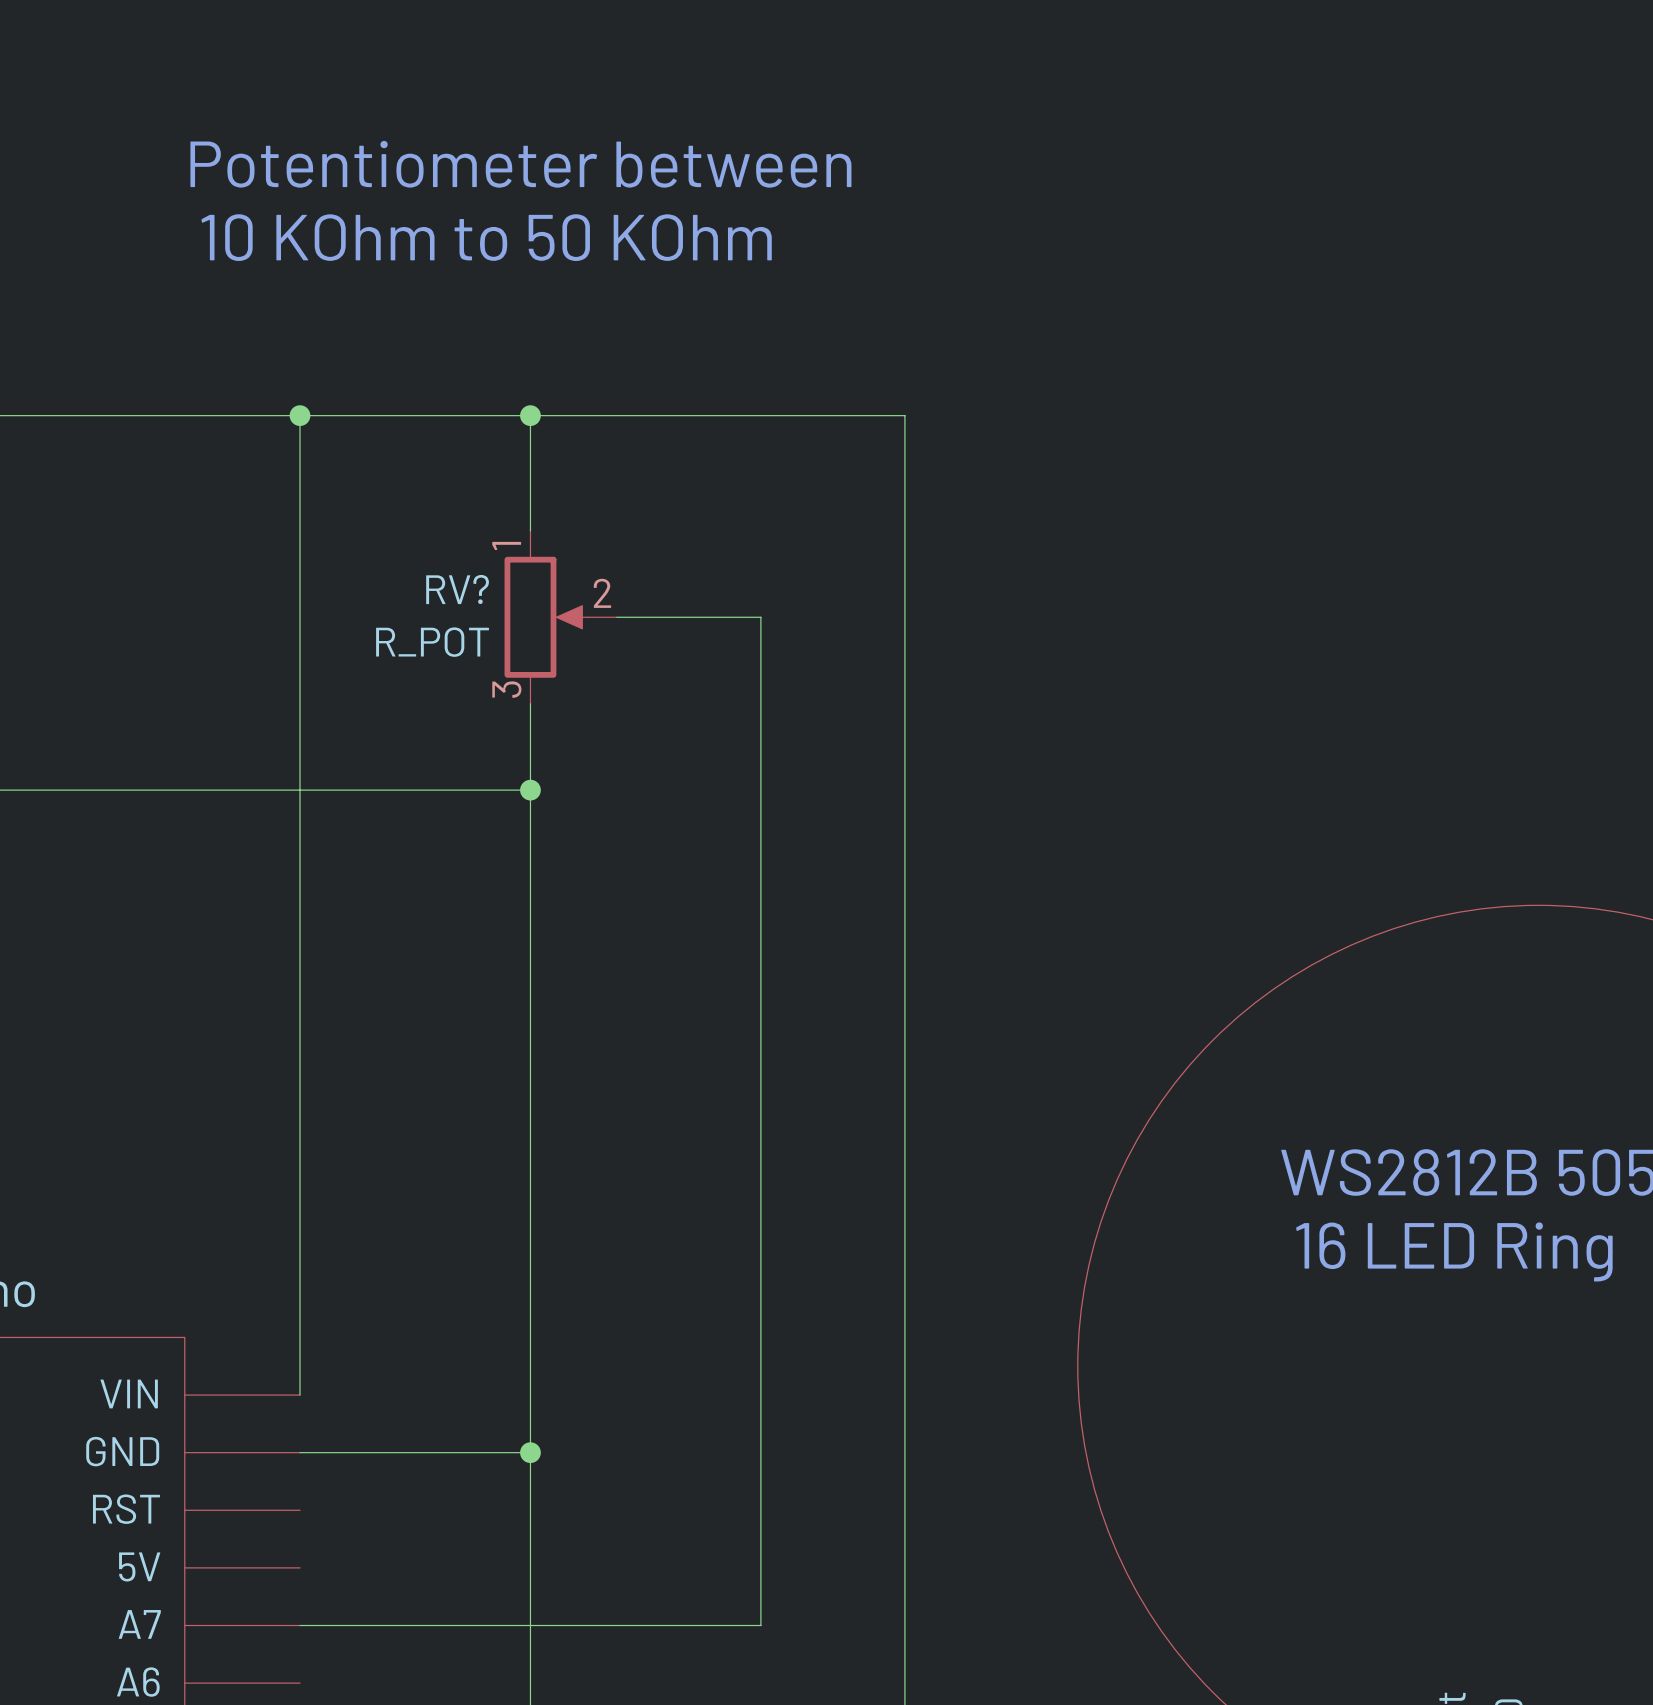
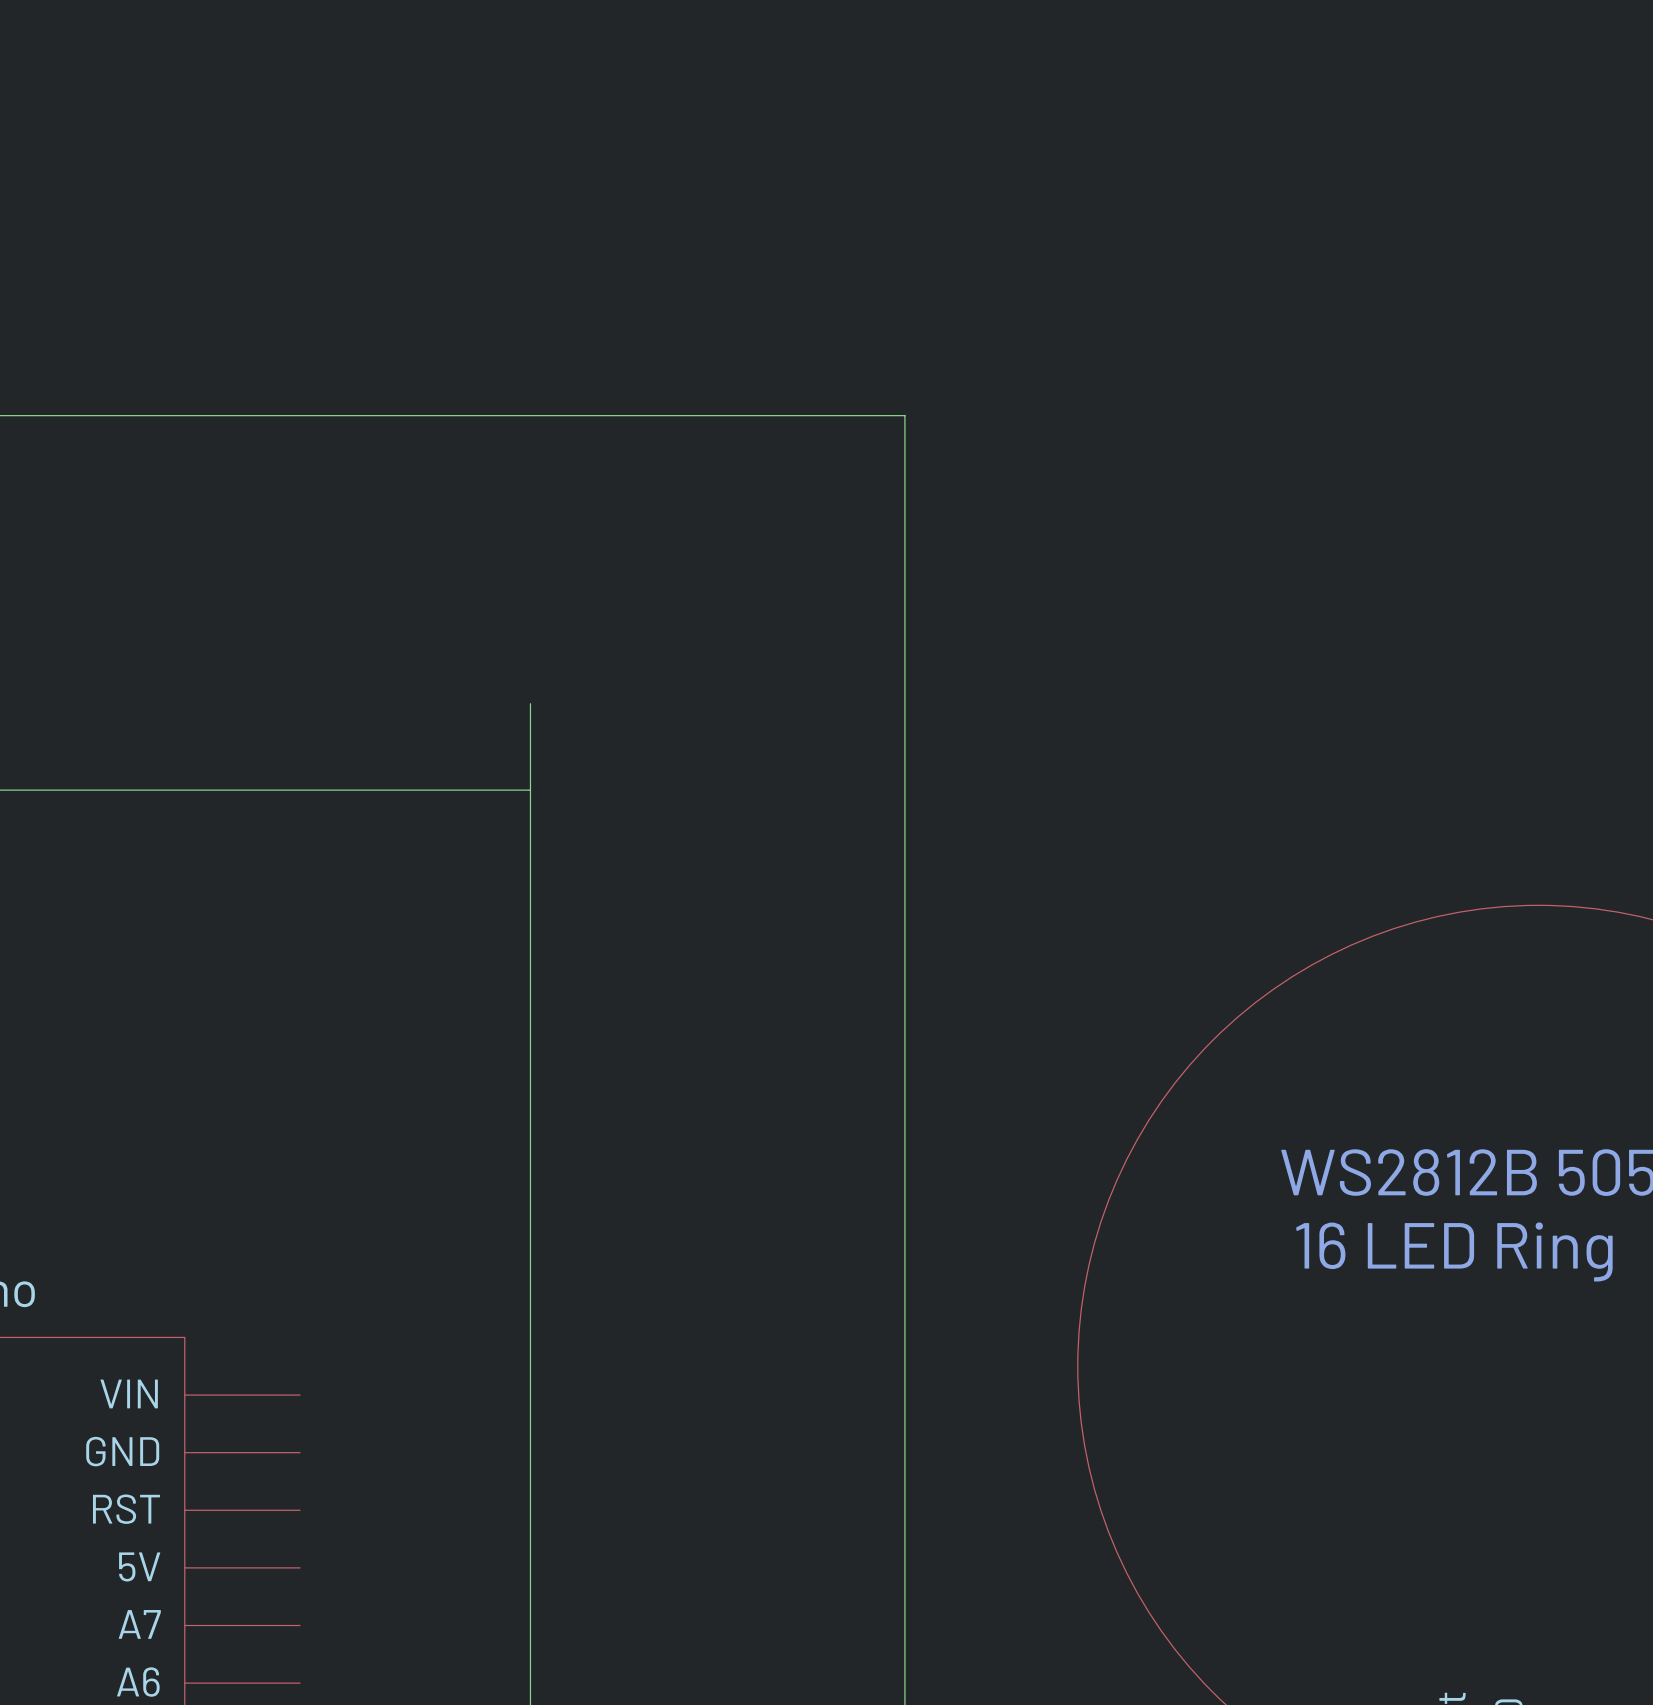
text: Potentiometer between (520, 164) -> none
text: 10 KOhm to 50 KOhm (486, 237) -> none
wire: (300, 415) (300, 1395) -> none
junction: (300, 415) -> none
wire: (530, 415) (530, 530) -> none
junction: (530, 415) -> none
RV?: R_POT (560, 617) -> none
wire: (616, 617) (760, 617) (760, 1625) (300, 1625) -> none
junction: (530, 790) -> none
wire: (300, 1452) (530, 1452) -> none
junction: (530, 1452) -> none

